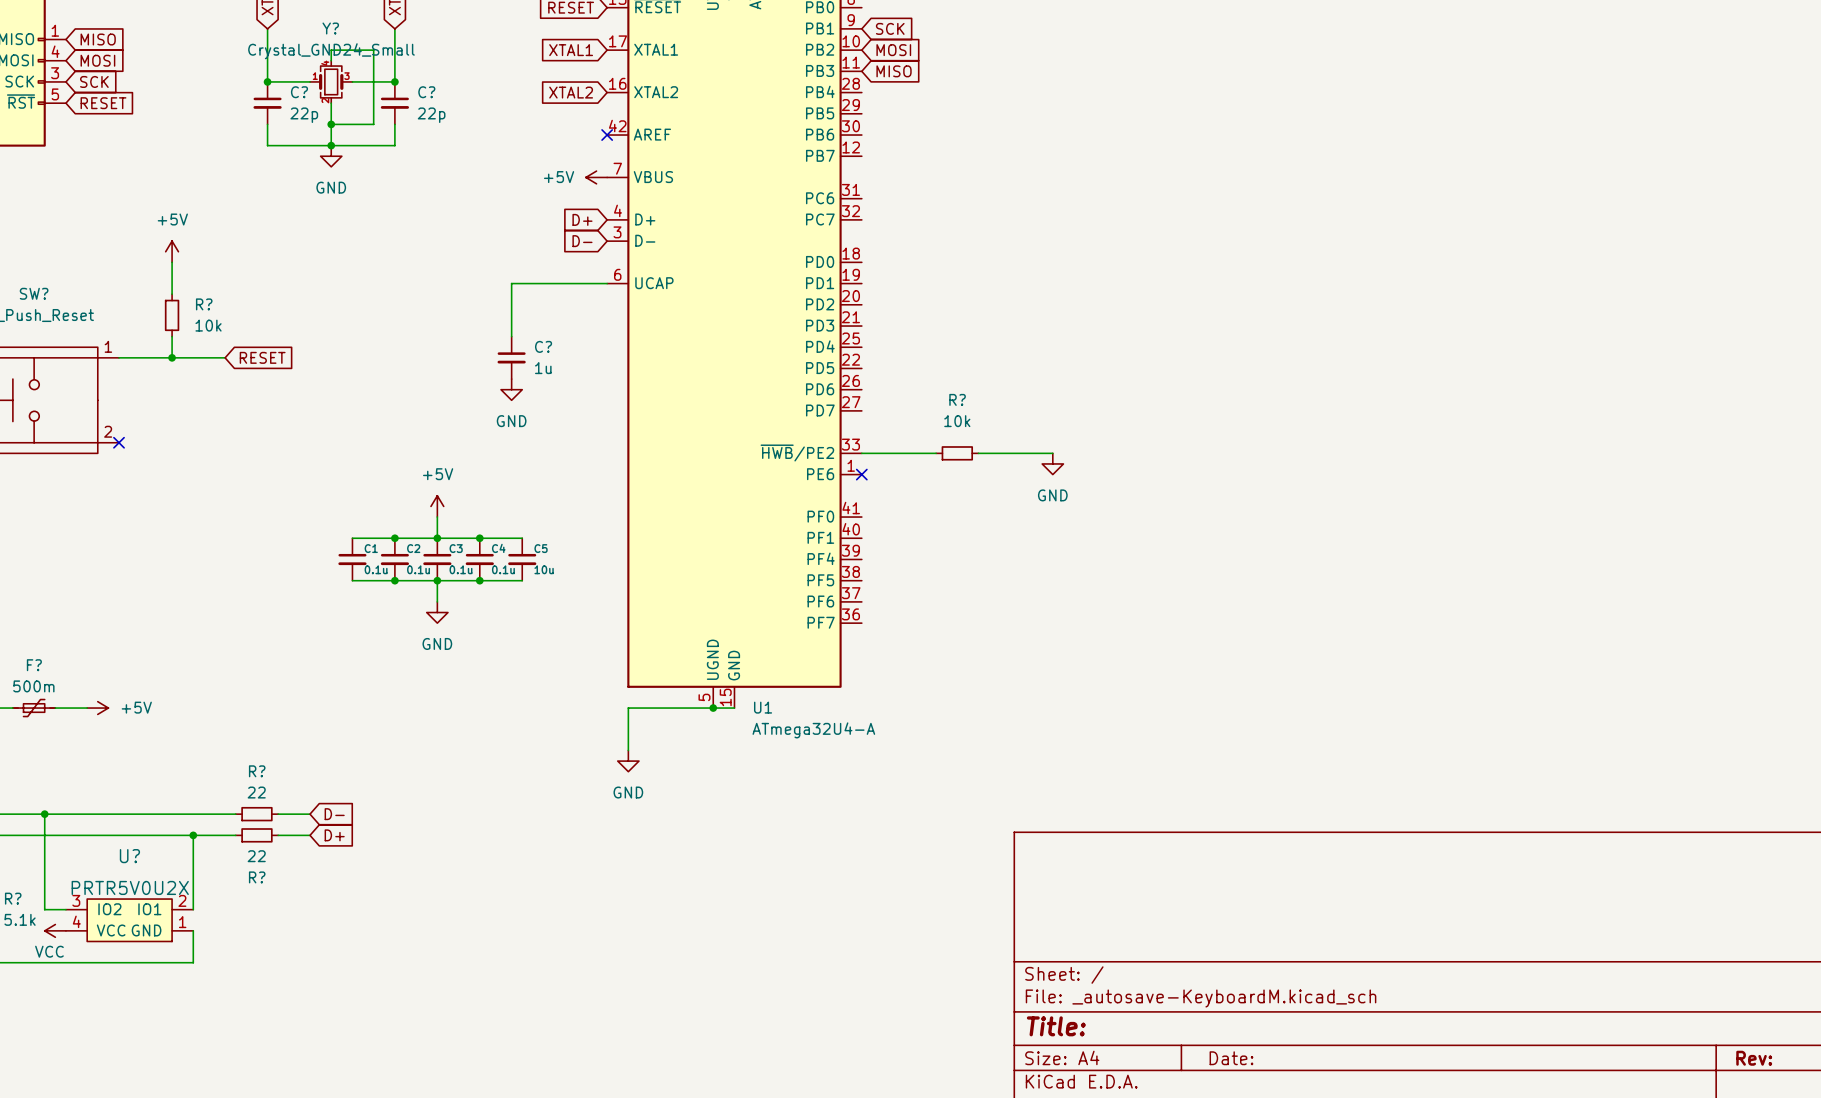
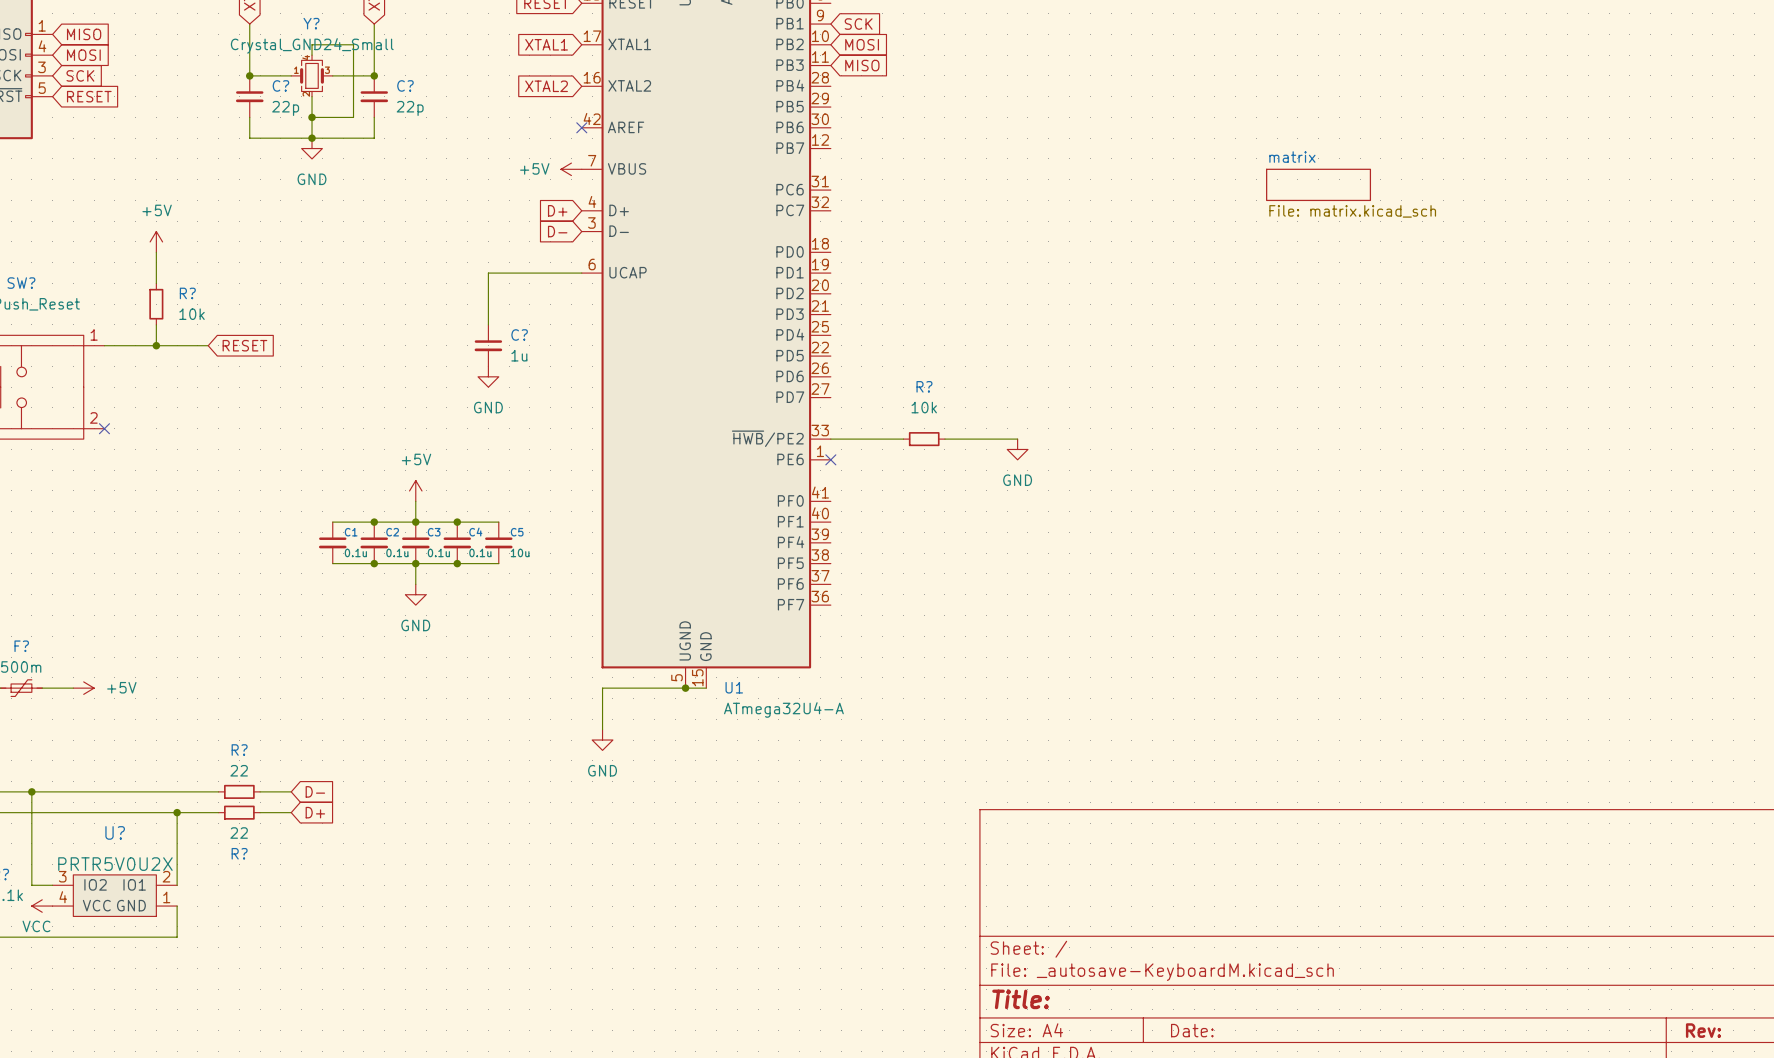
sheet matrix: none -> File: matrix.kicad_sch (1318, 184)

